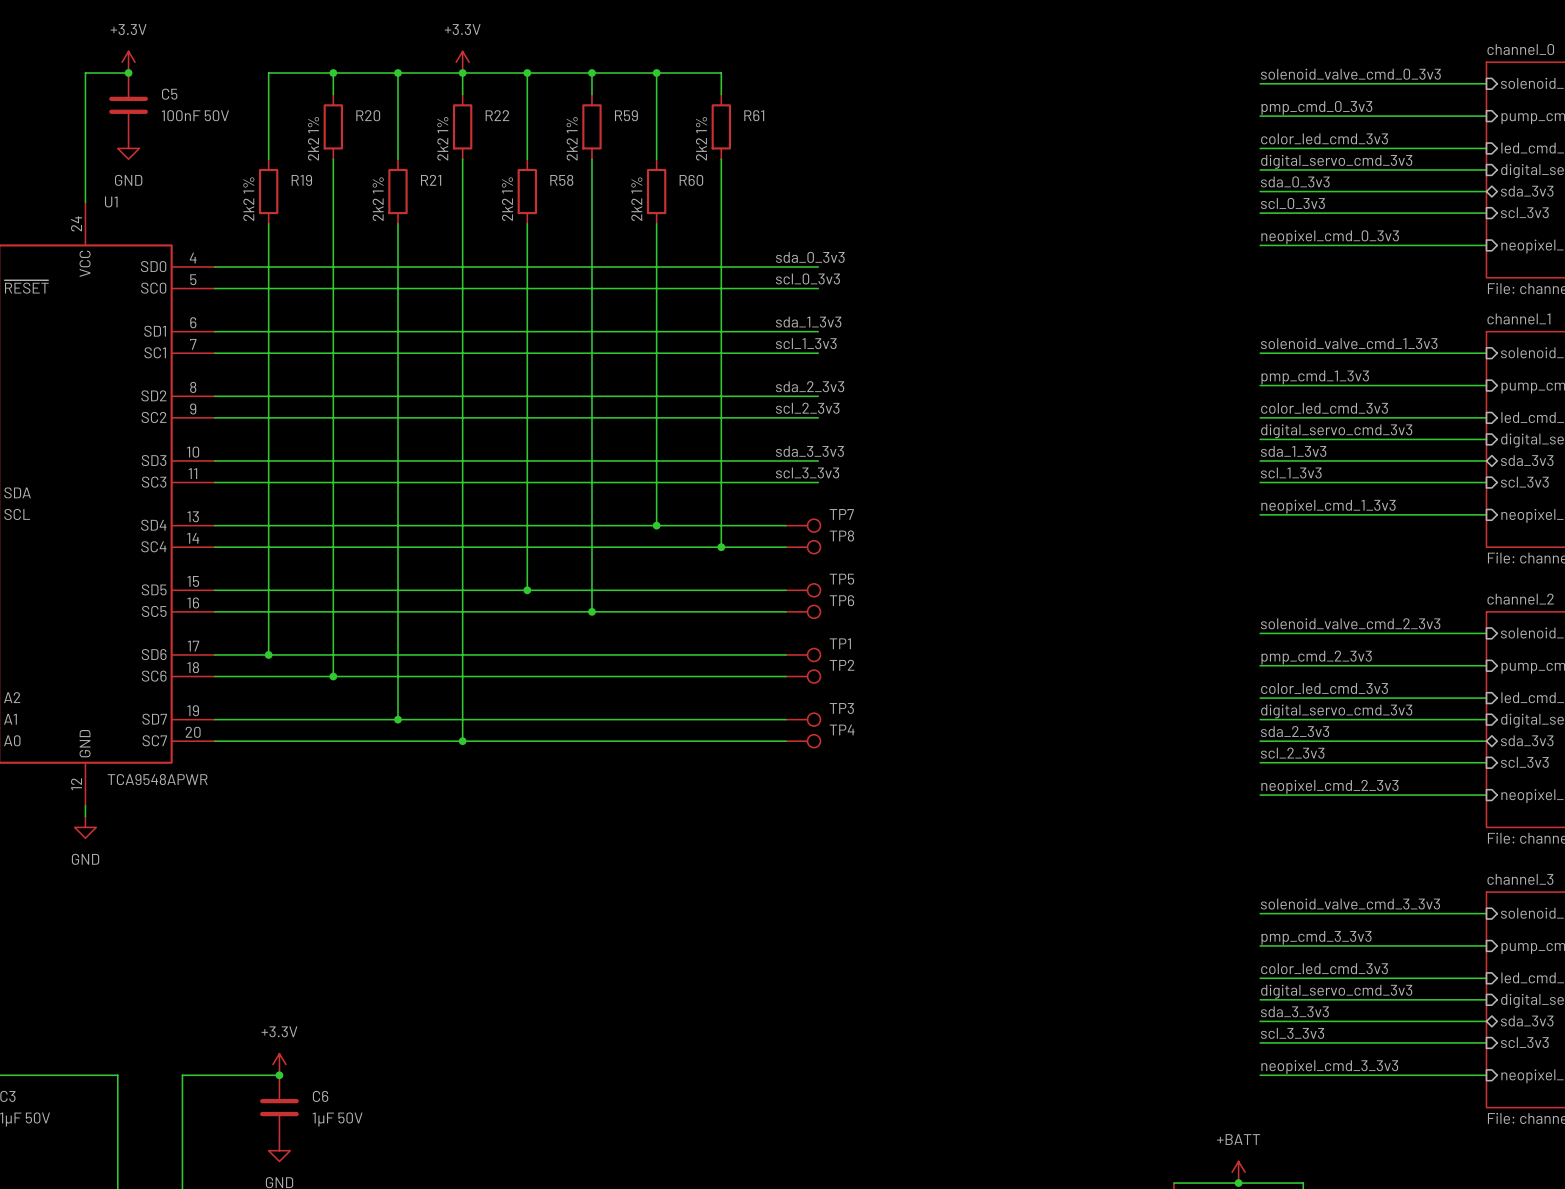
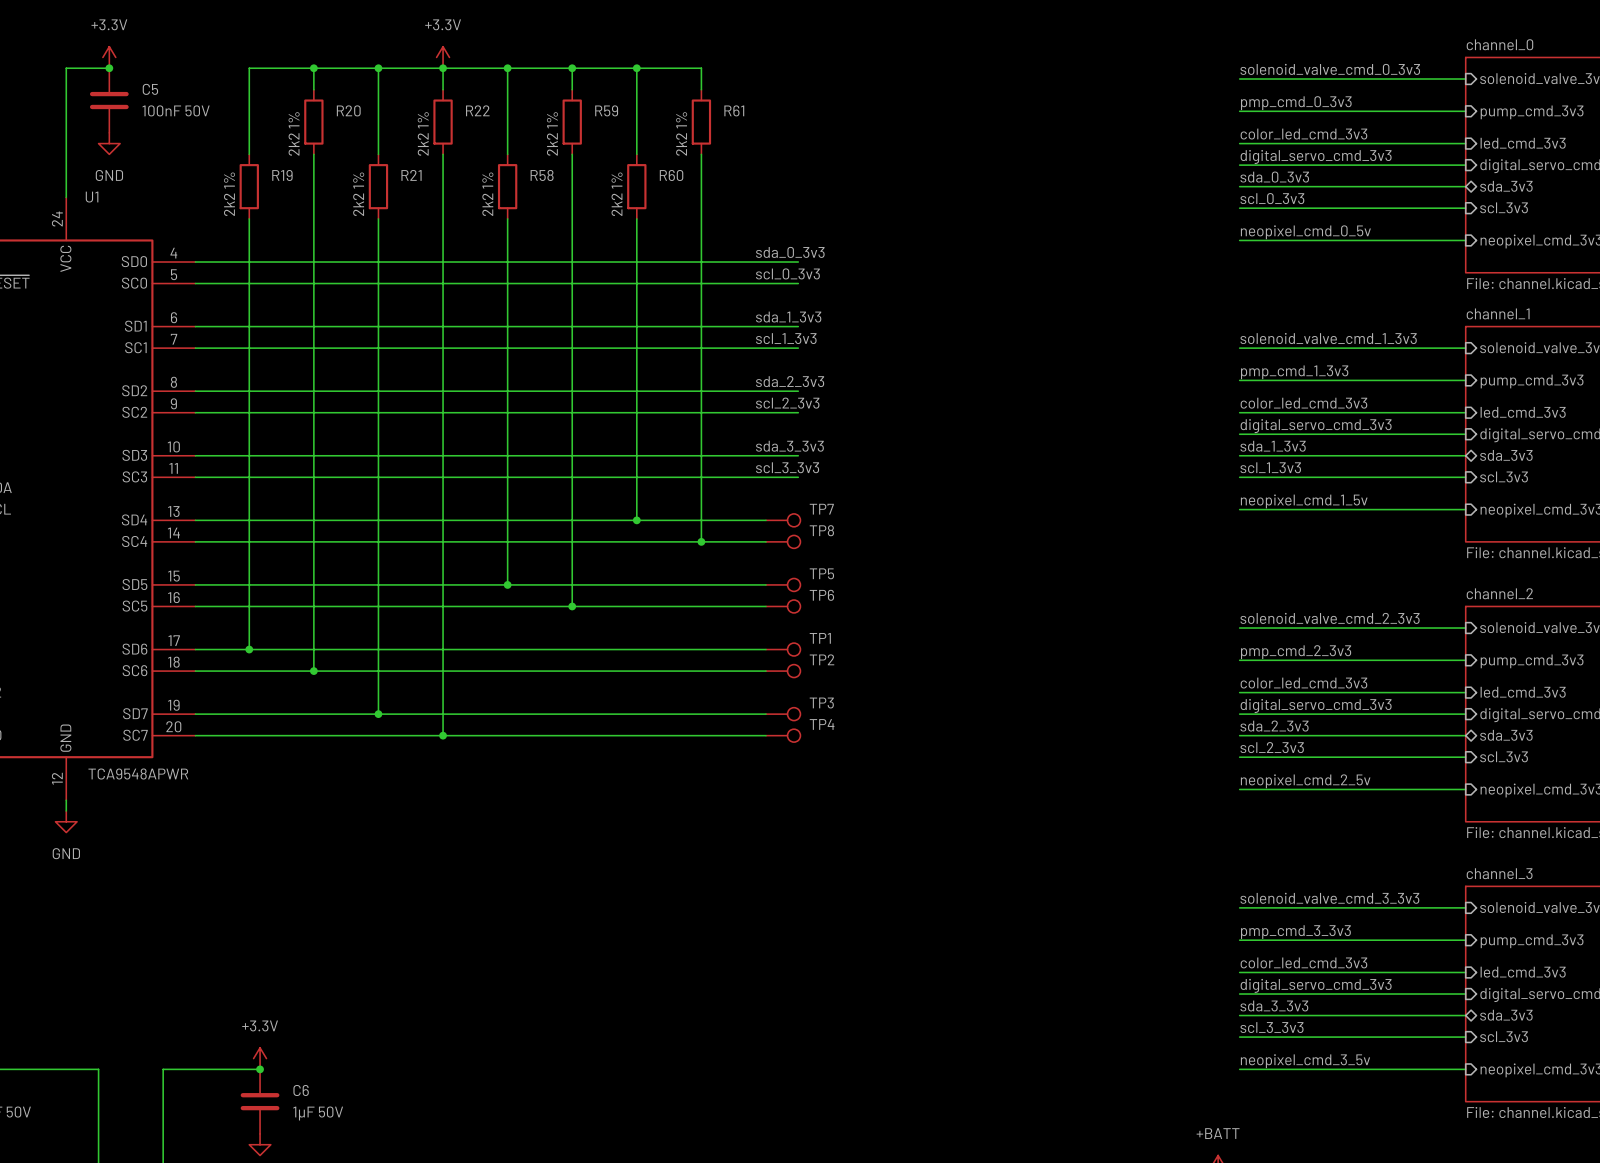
label: neopixel_cmd_0_3v3 (1330, 237) -> neopixel_cmd_0_5v (1305, 232)
label: neopixel_cmd_1_3v3 (1328, 506) -> neopixel_cmd_1_5v (1304, 501)
label: neopixel_cmd_2_3v3 (1329, 786) -> neopixel_cmd_2_5v (1305, 781)
label: neopixel_cmd_3_3v3 (1329, 1067) -> neopixel_cmd_3_5v (1305, 1061)

